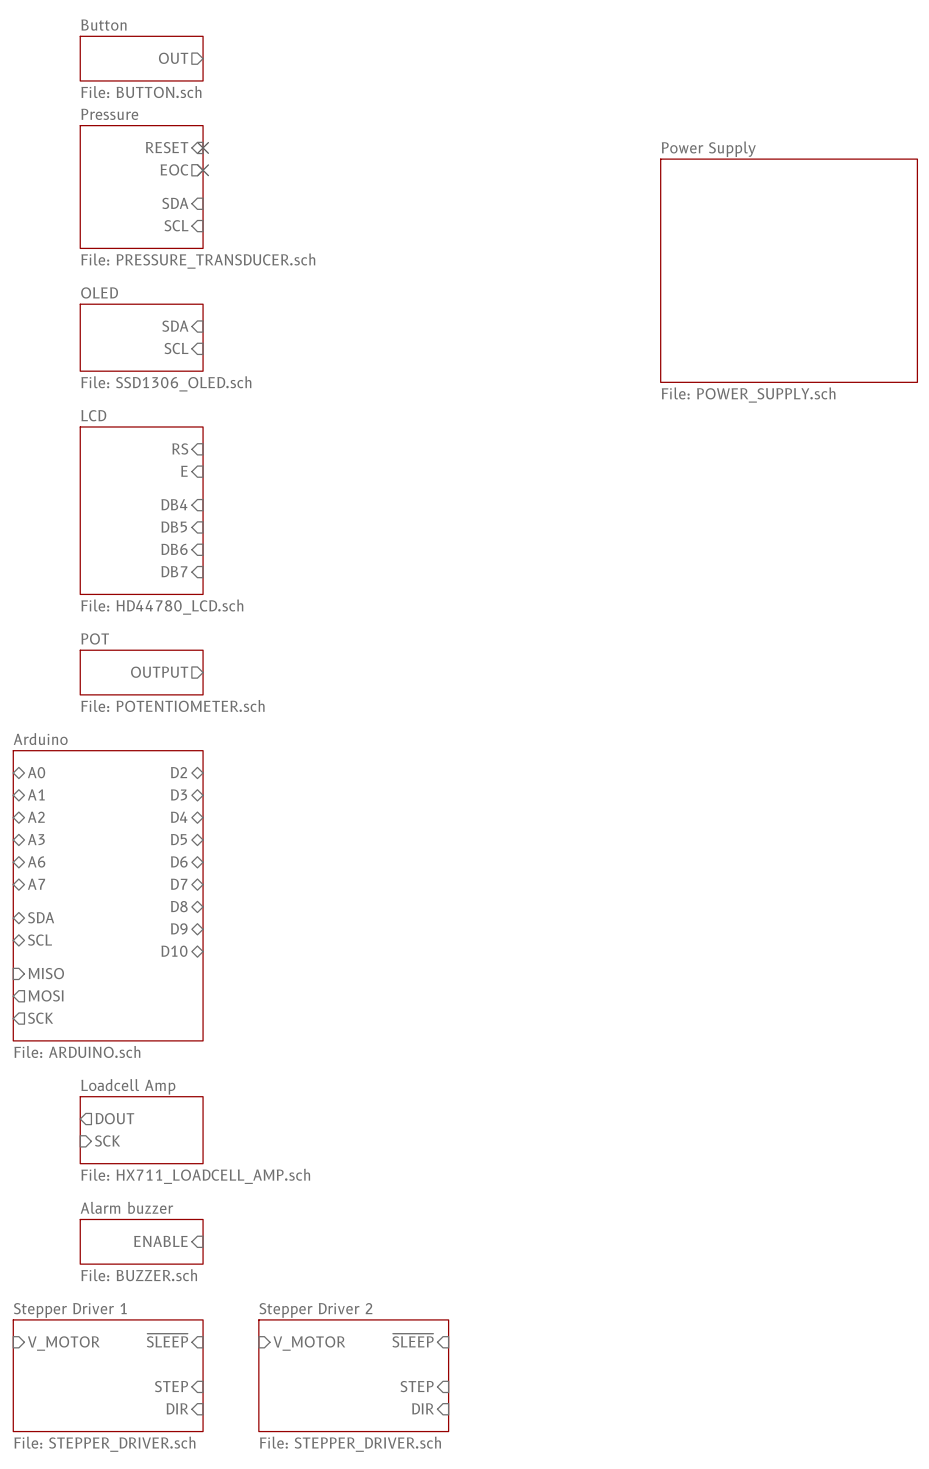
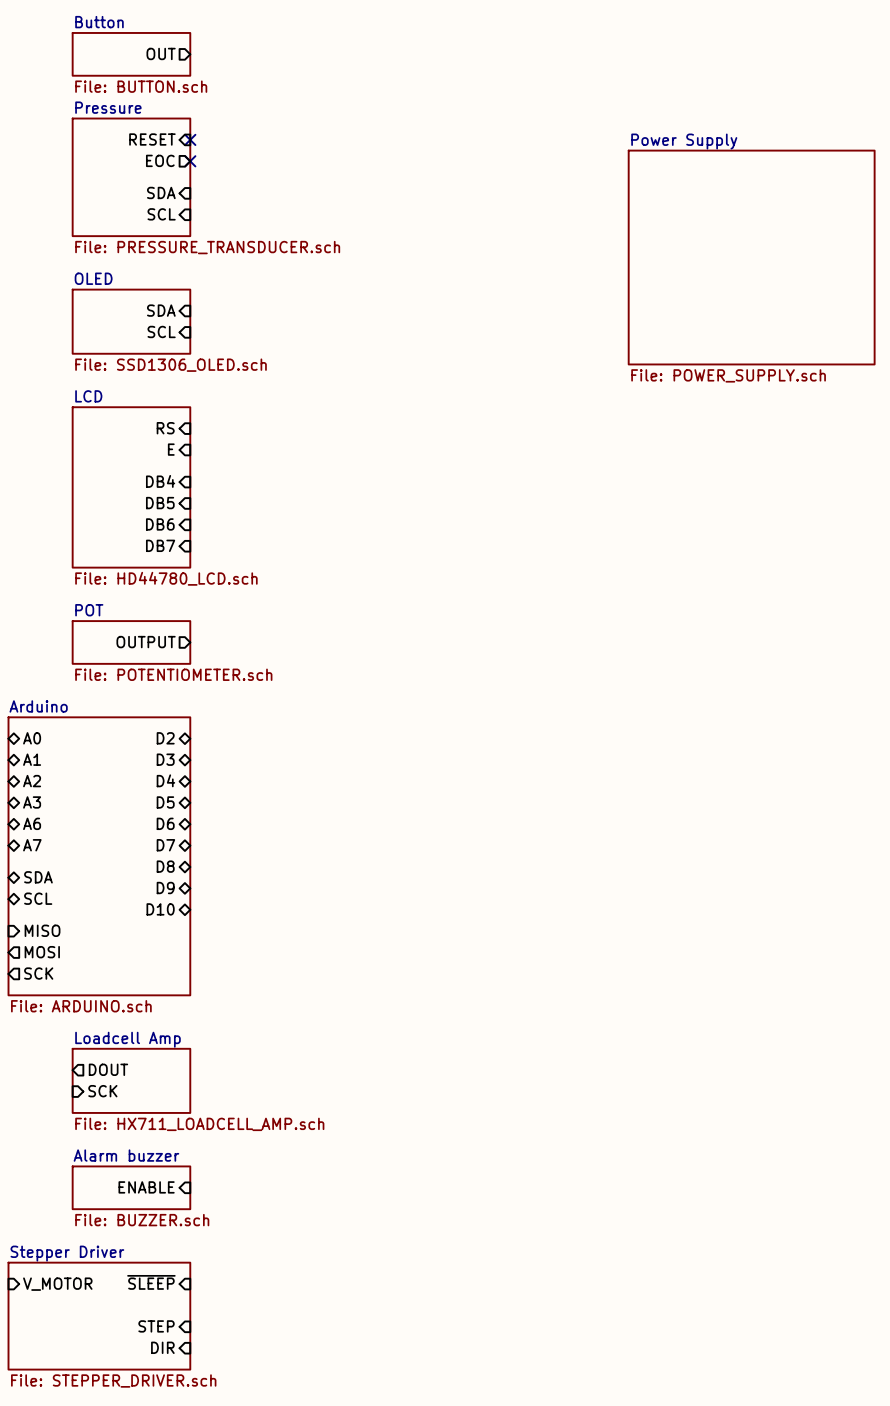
sheet Stepper Driver 1 name: Stepper Driver 1 (70, 1310) -> Stepper Driver (67, 1253)
sheet pin: ~{SLEEP} (413, 1340) -> none
sheet pin: V_MOTOR (309, 1343) -> none
sheet Stepper Driver 2: File: STEPPER_DRIVER.sch (353, 1375) -> none
sheet pin: STEP (417, 1386) -> none
sheet pin: DIR (423, 1408) -> none

